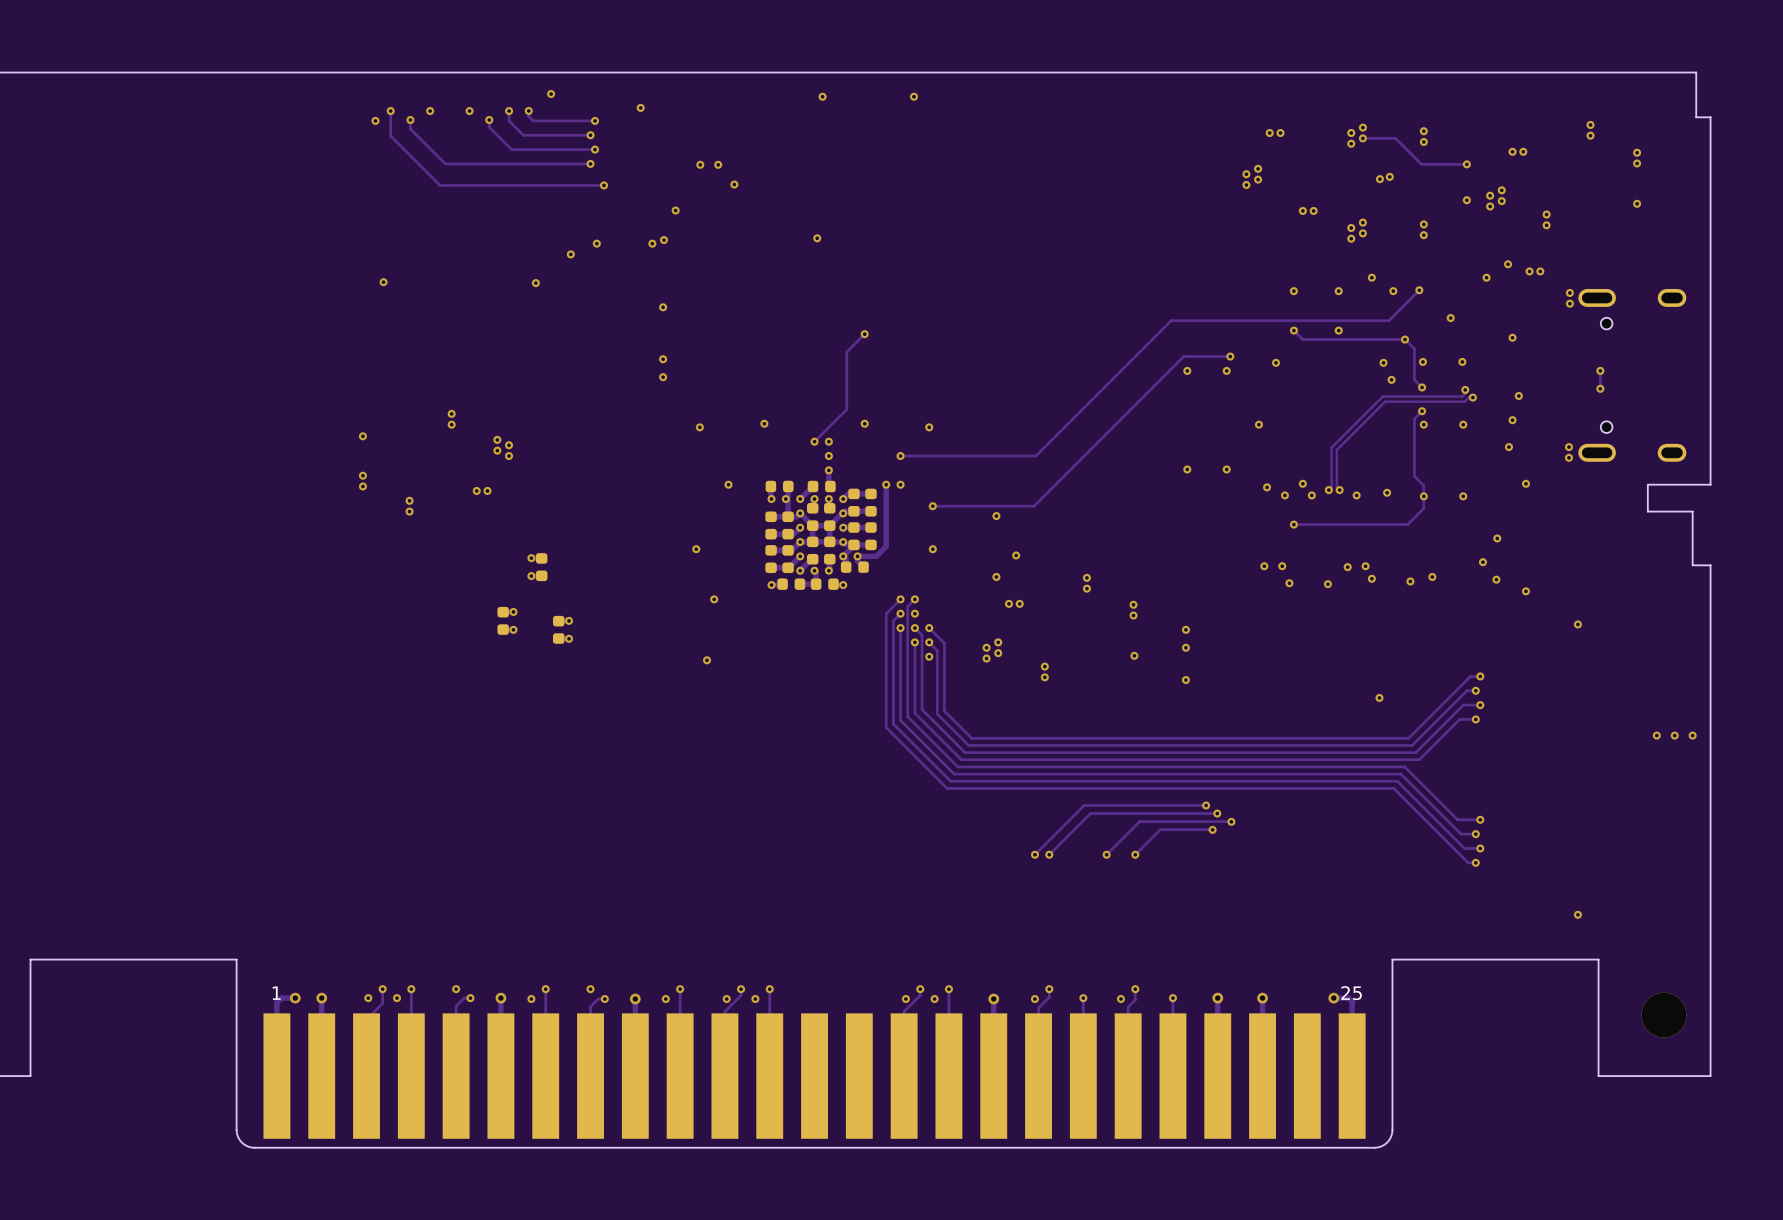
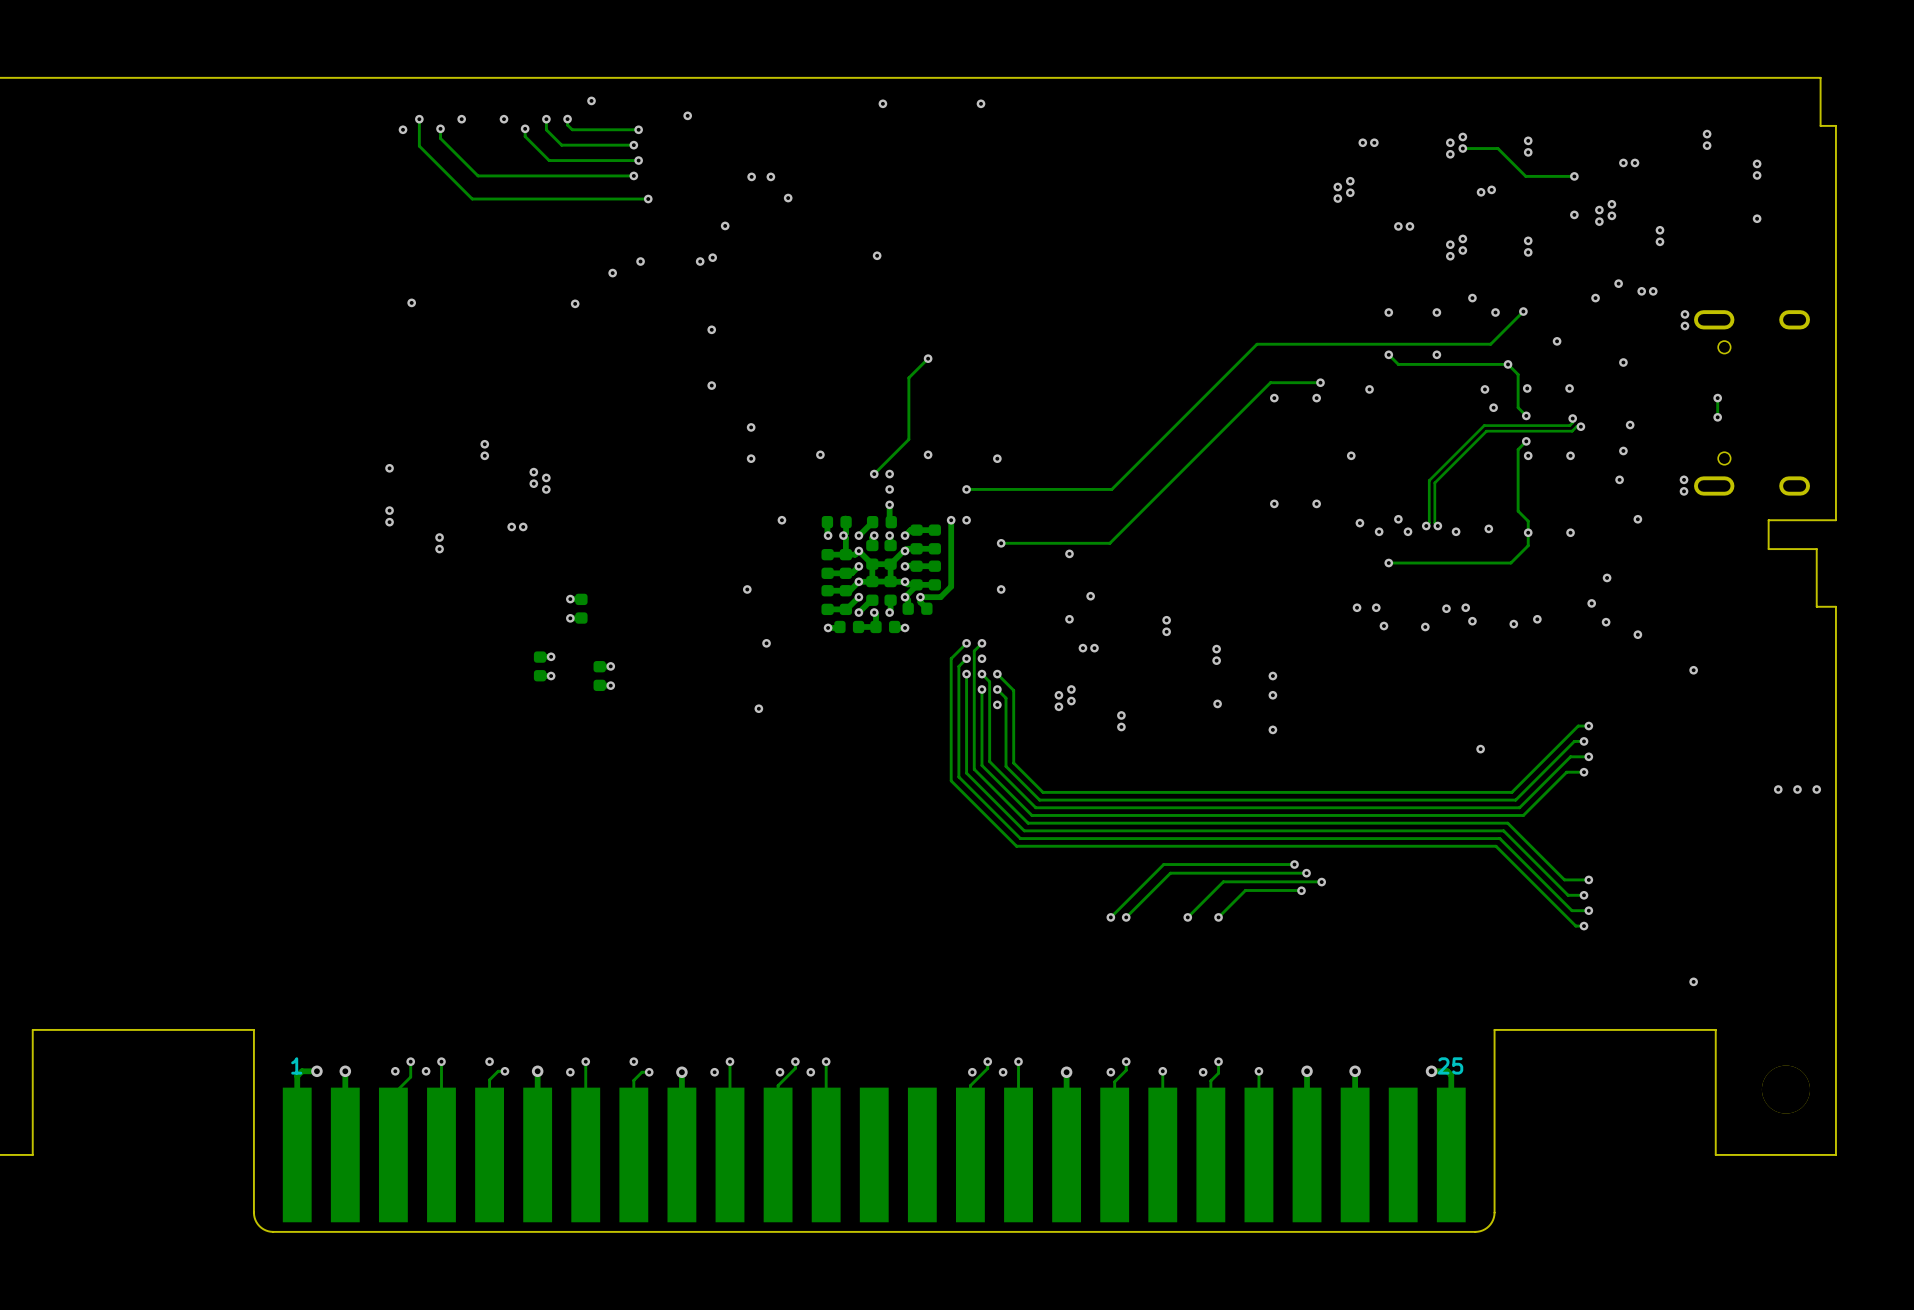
via position: (663, 377) -> (751, 427)

